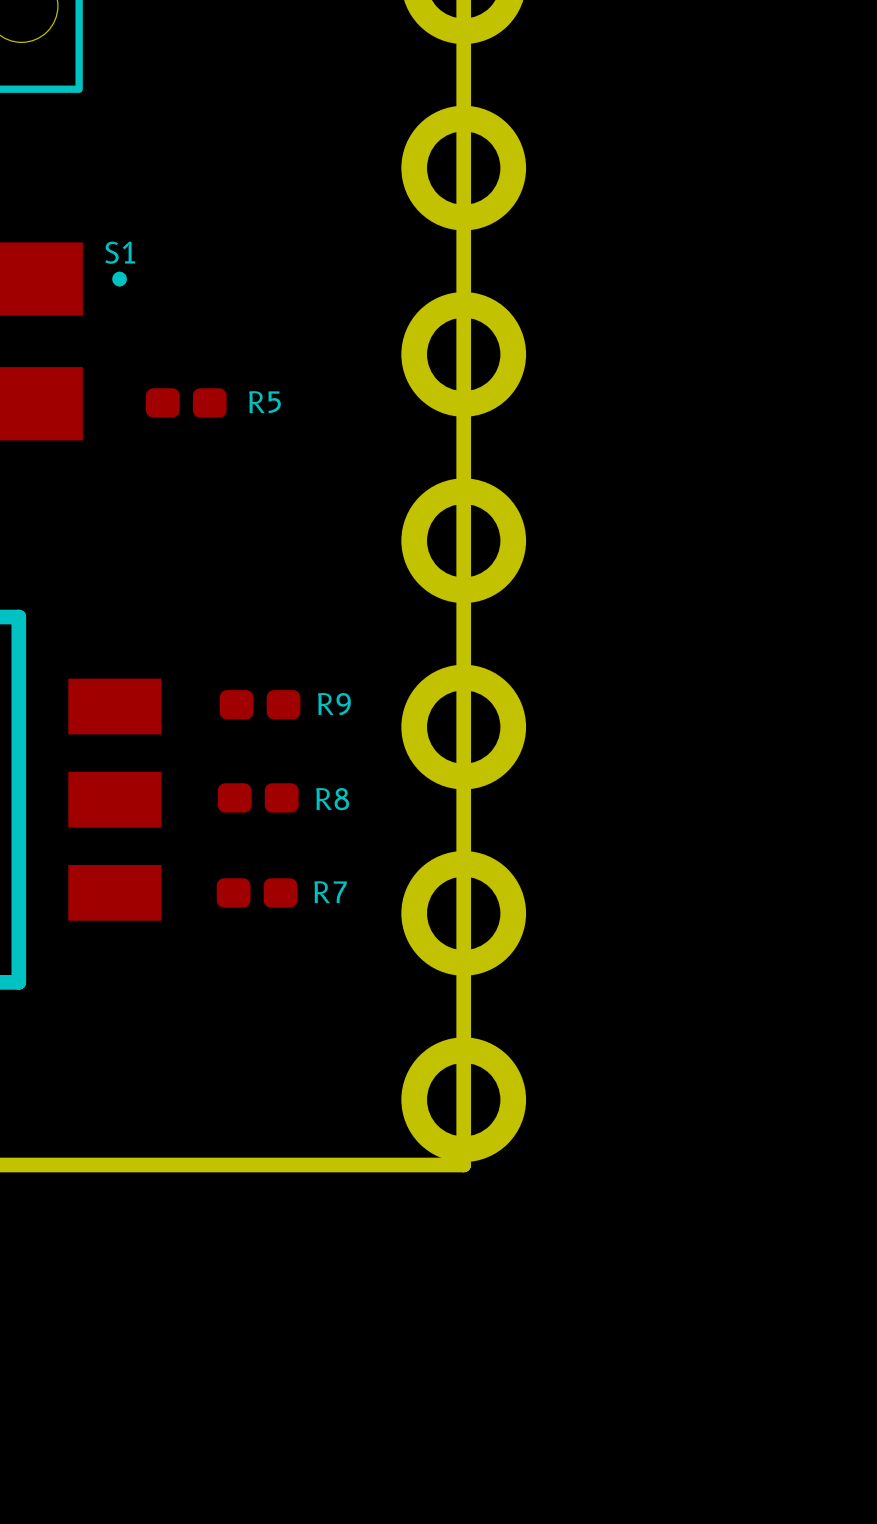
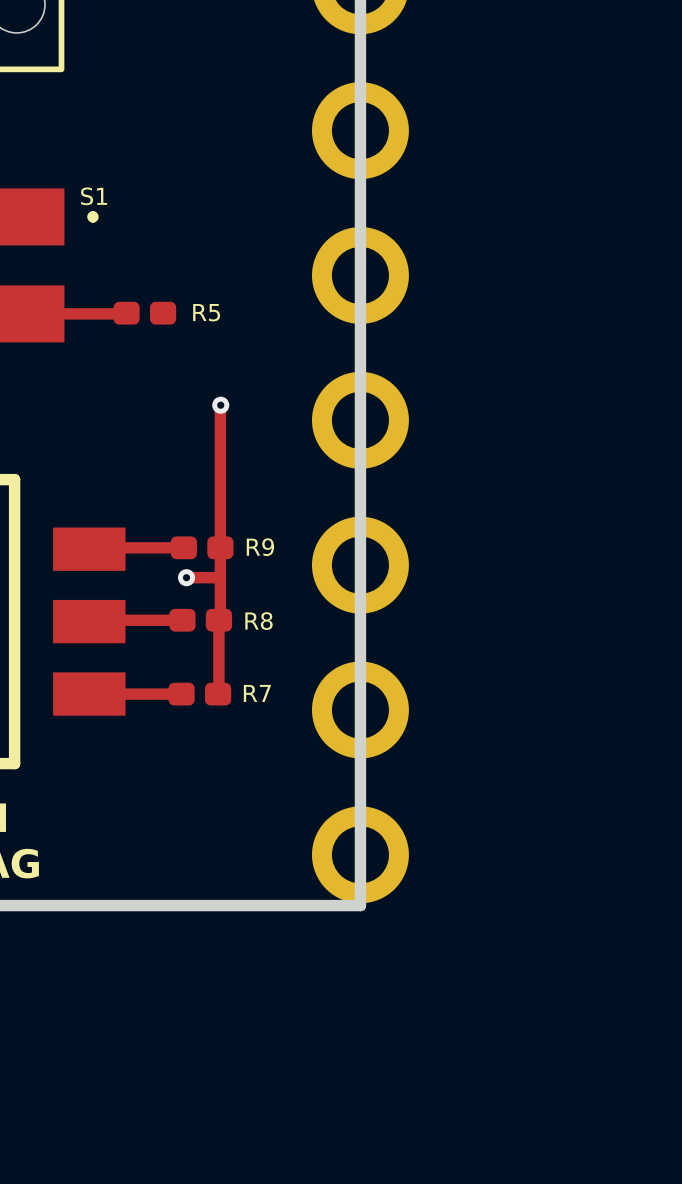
track: none -> (23, 313) (125, 313)
track: none -> (220, 405) (218, 693)
via: none -> (220, 405)
track: none -> (183, 547) (89, 549)
track: none -> (186, 577) (220, 577)
via: none -> (186, 577)
track: none -> (182, 620) (89, 621)
track: none -> (89, 694) (181, 694)

